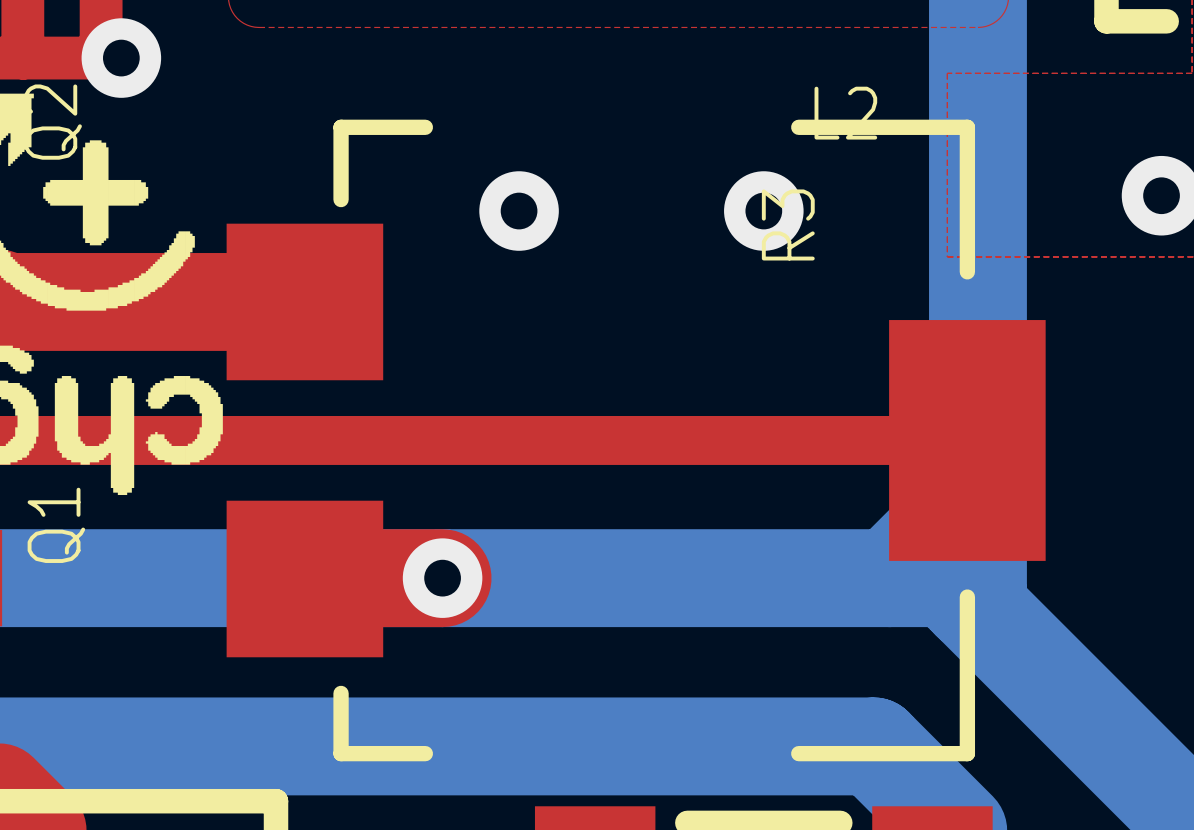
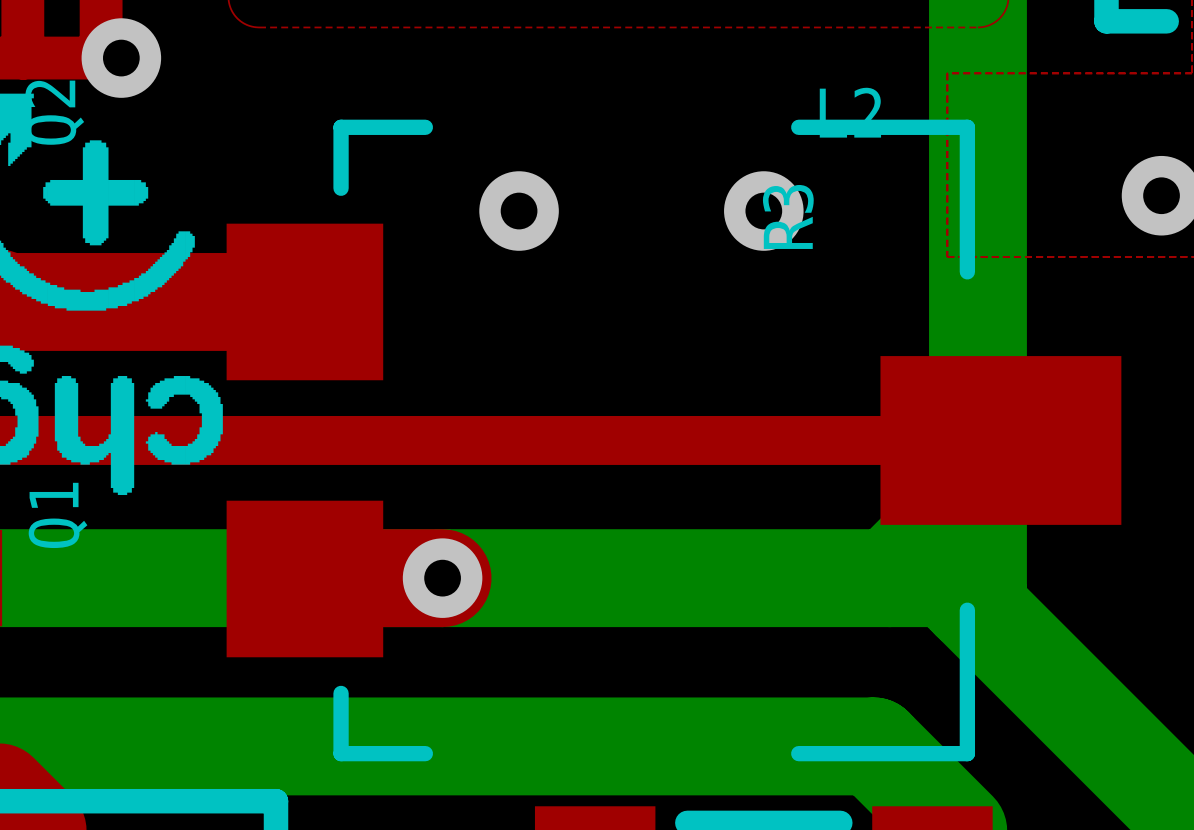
R3 footprint: [226, 119, 1046, 762] -> [226, 119, 1122, 762]

